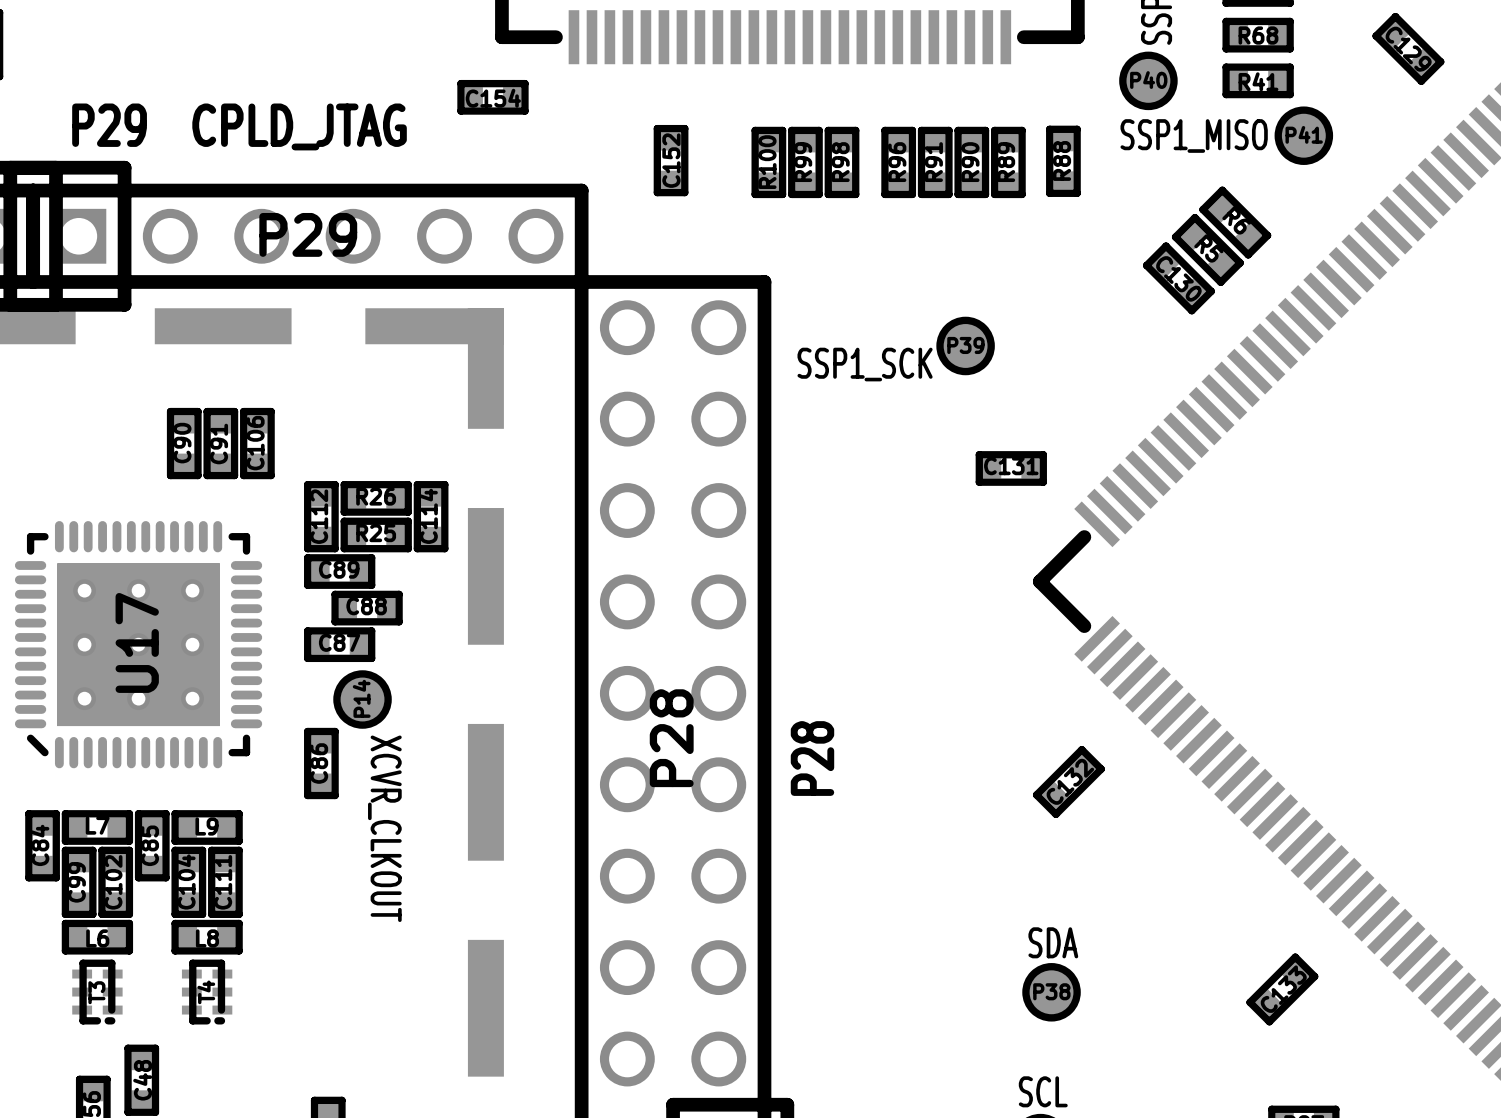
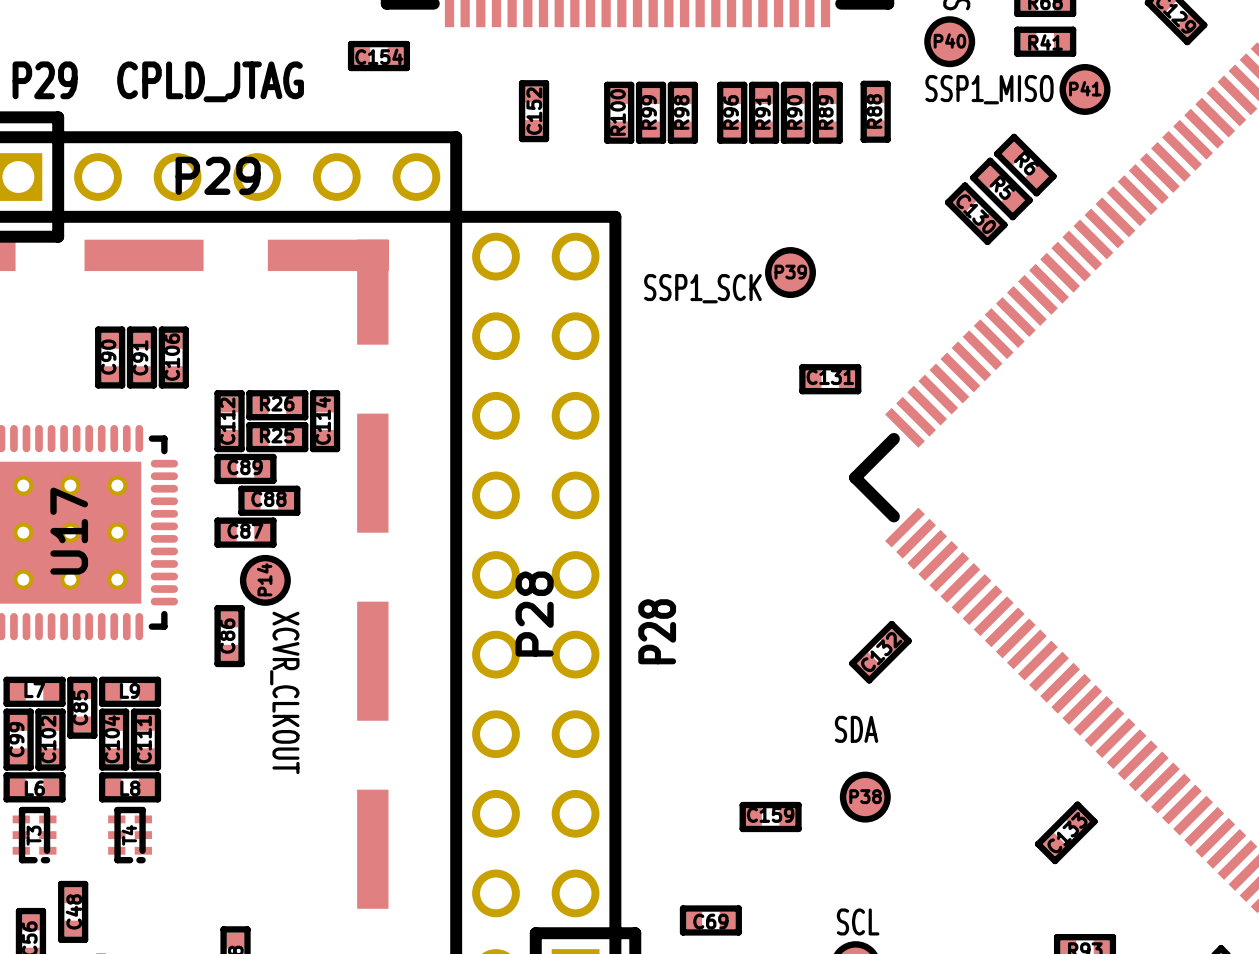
text position: SDA (1053, 942) -> SDA (856, 729)
C159: none -> (770, 817)
P38 position: (1051, 992) -> (865, 797)
C69: none -> (710, 920)

